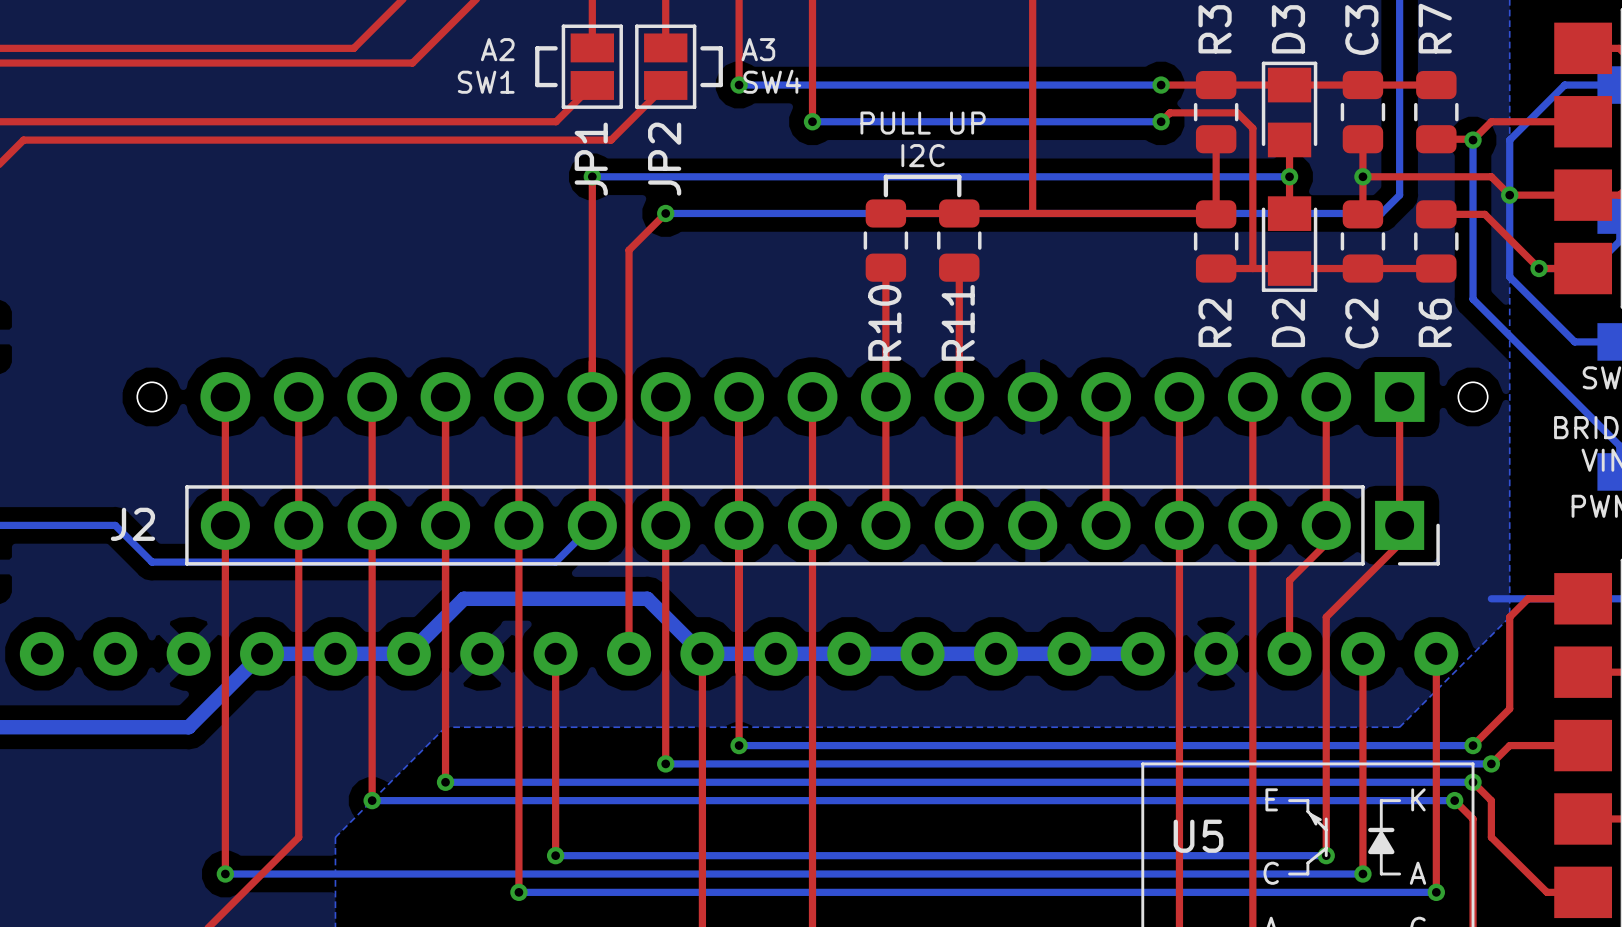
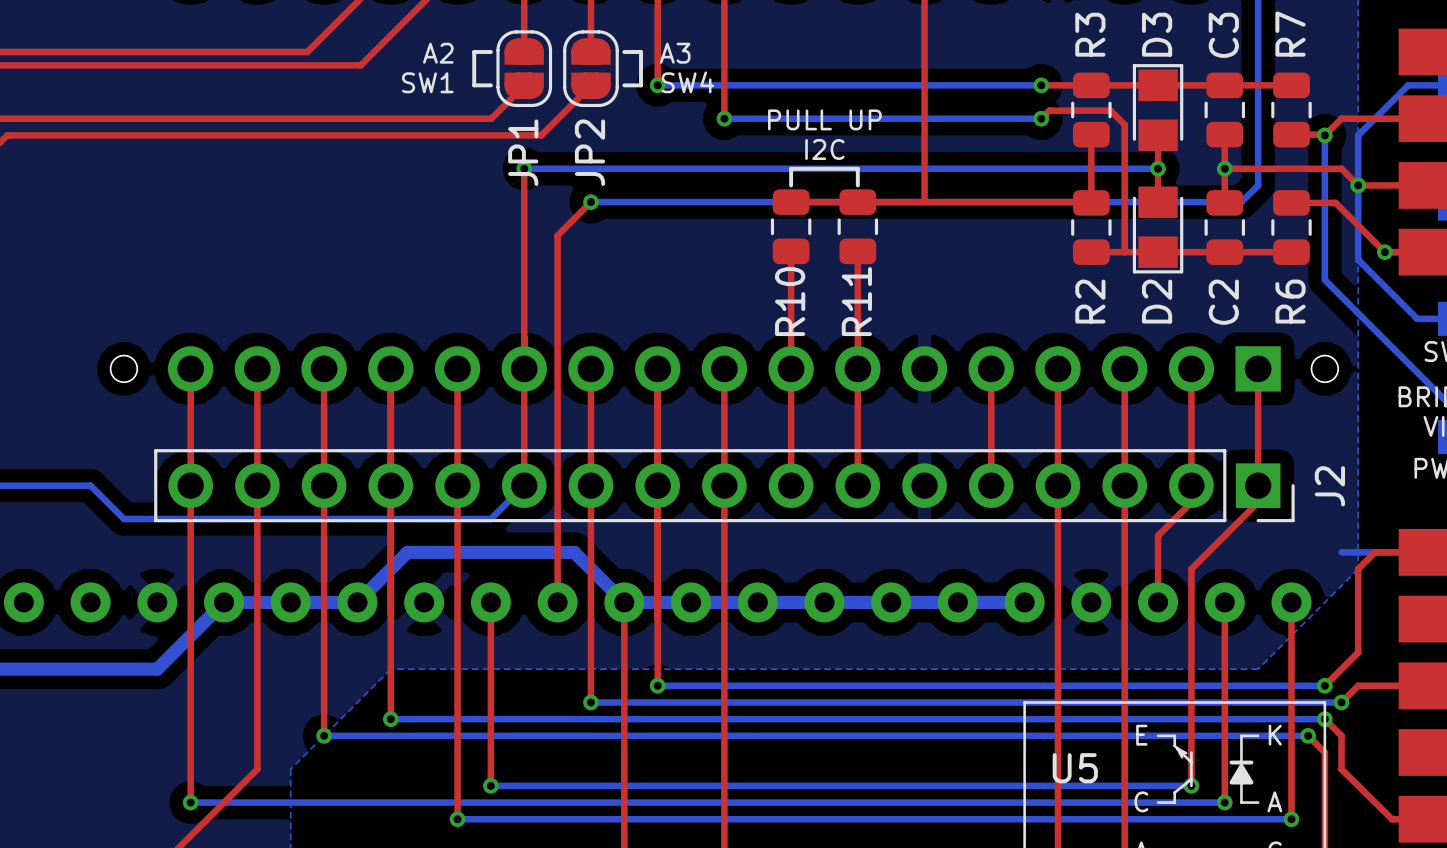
JP1 footprint: [561, 24, 623, 109] -> [496, 30, 553, 108]
JP2 footprint: [635, 24, 697, 109] -> [563, 30, 619, 108]
J2 name rotation: 0° (132, 524) -> 90° counterclockwise (1329, 486)
J2 name position: J2 (132, 524) -> J2 (1329, 486)

